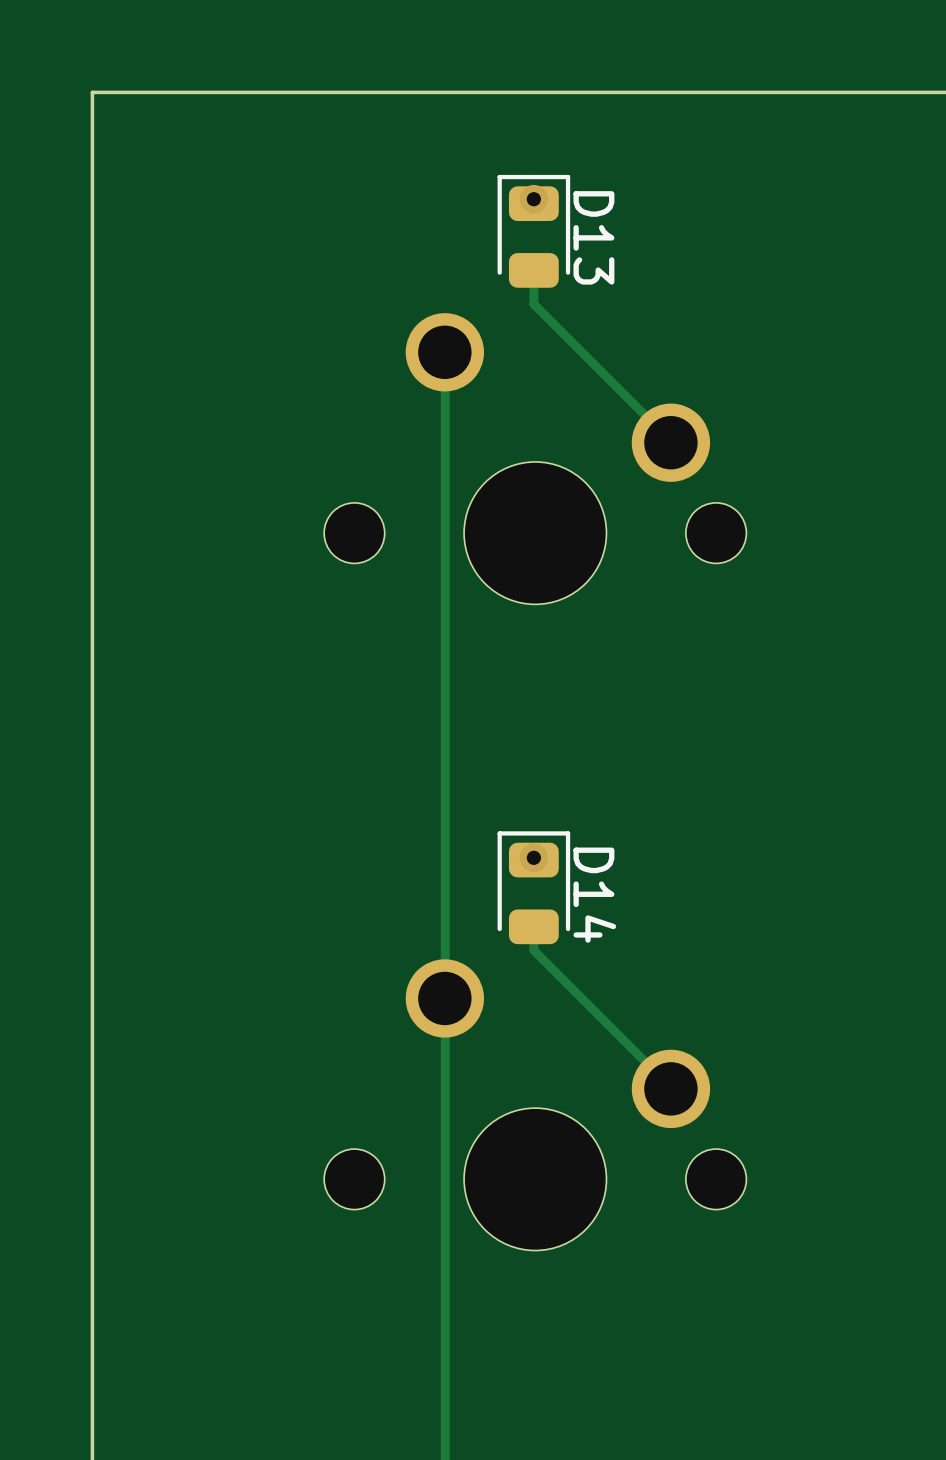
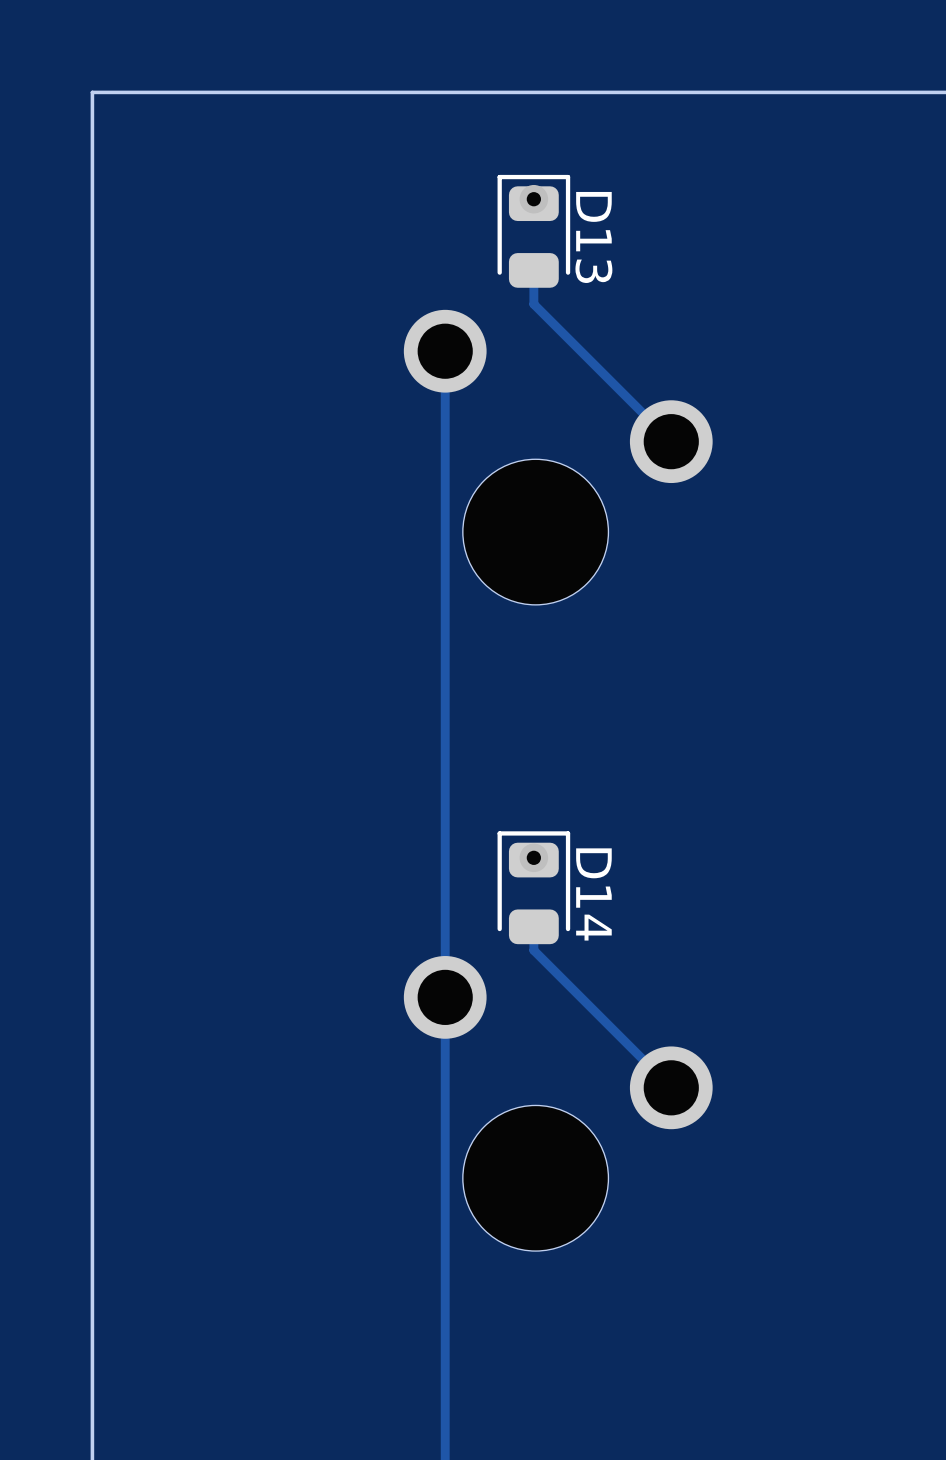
part footprint: [324, 313, 747, 605] -> [403, 309, 713, 605]
part footprint: [324, 959, 747, 1251] -> [403, 956, 713, 1252]

